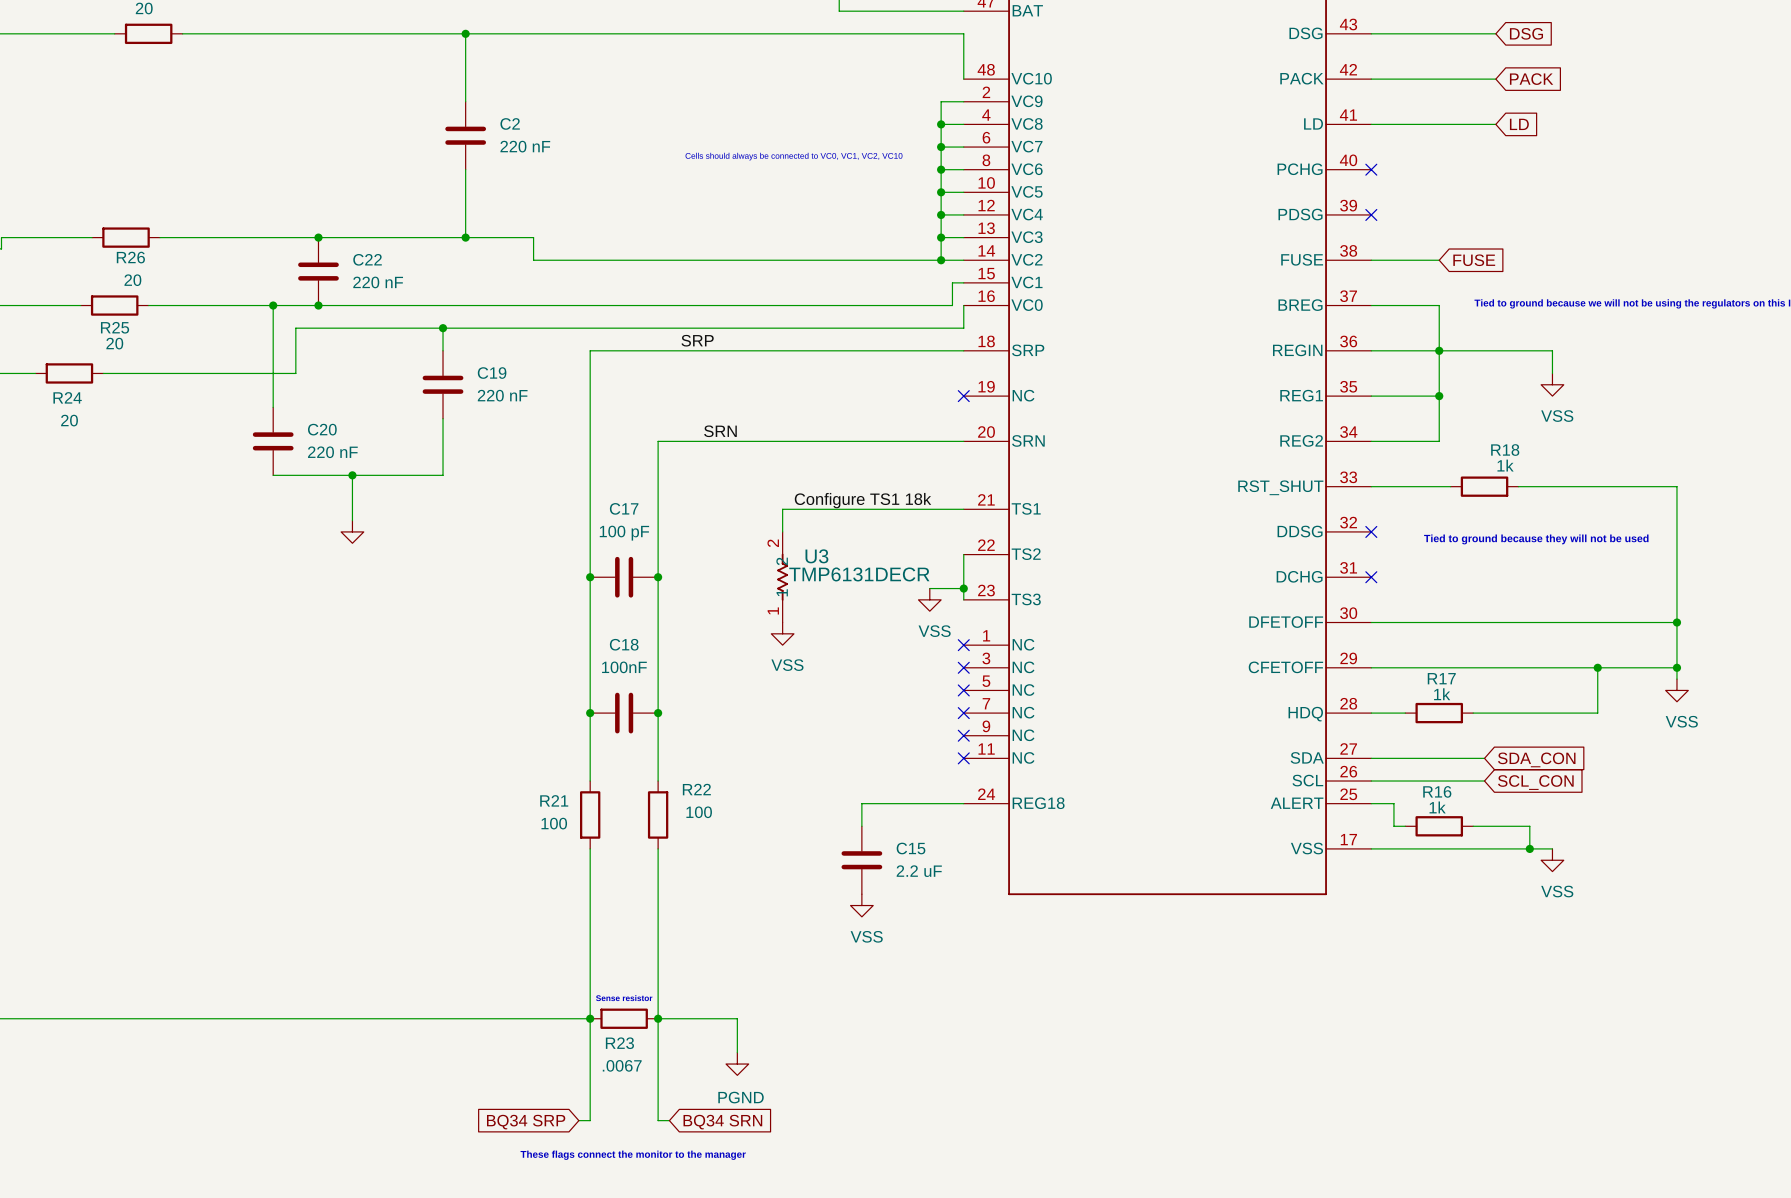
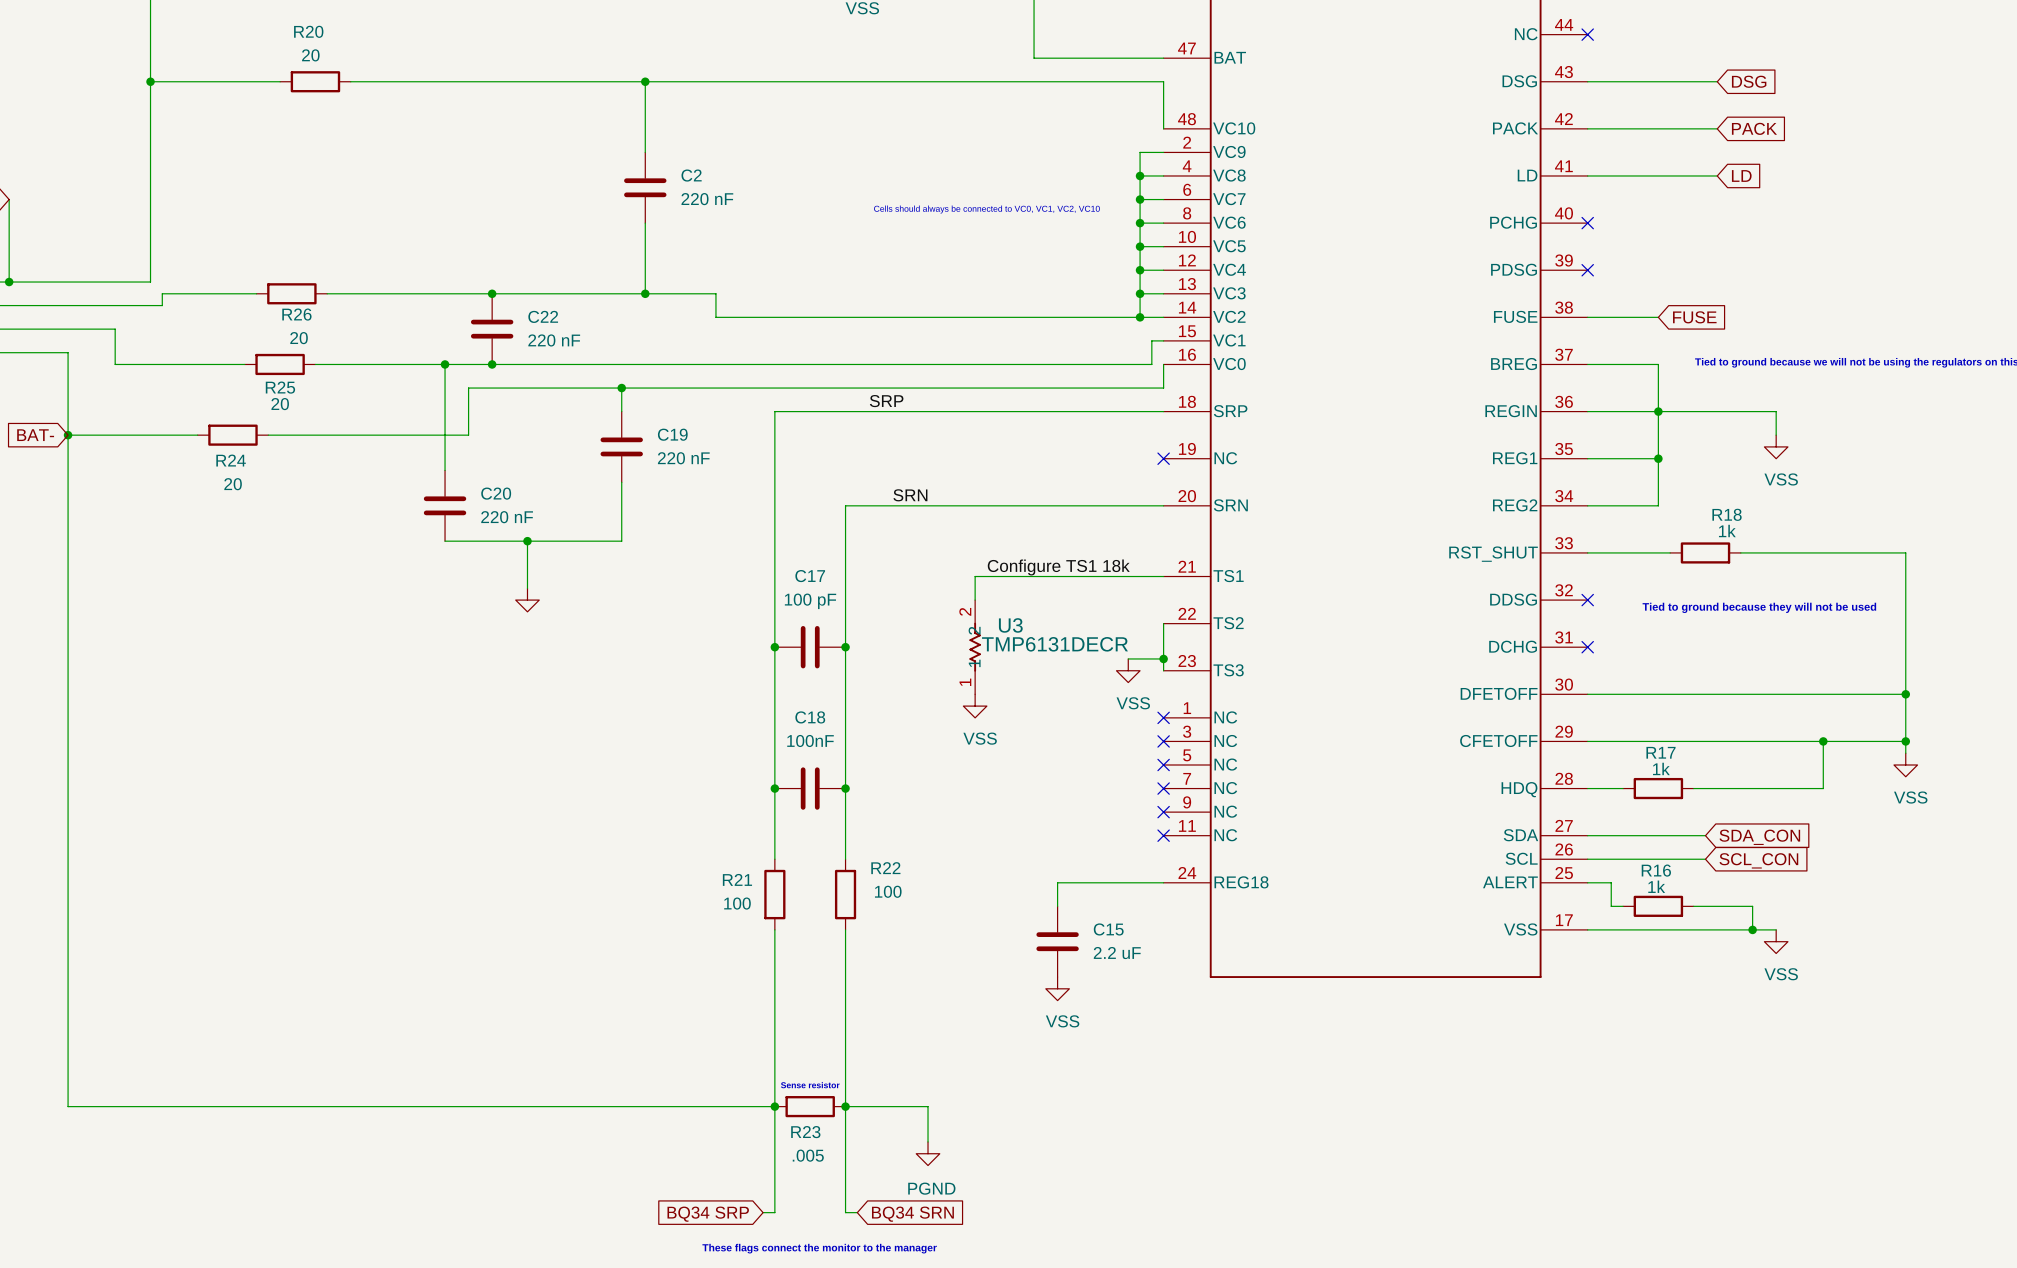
R23 value: .0067 (622, 1065) -> .005 (808, 1155)

